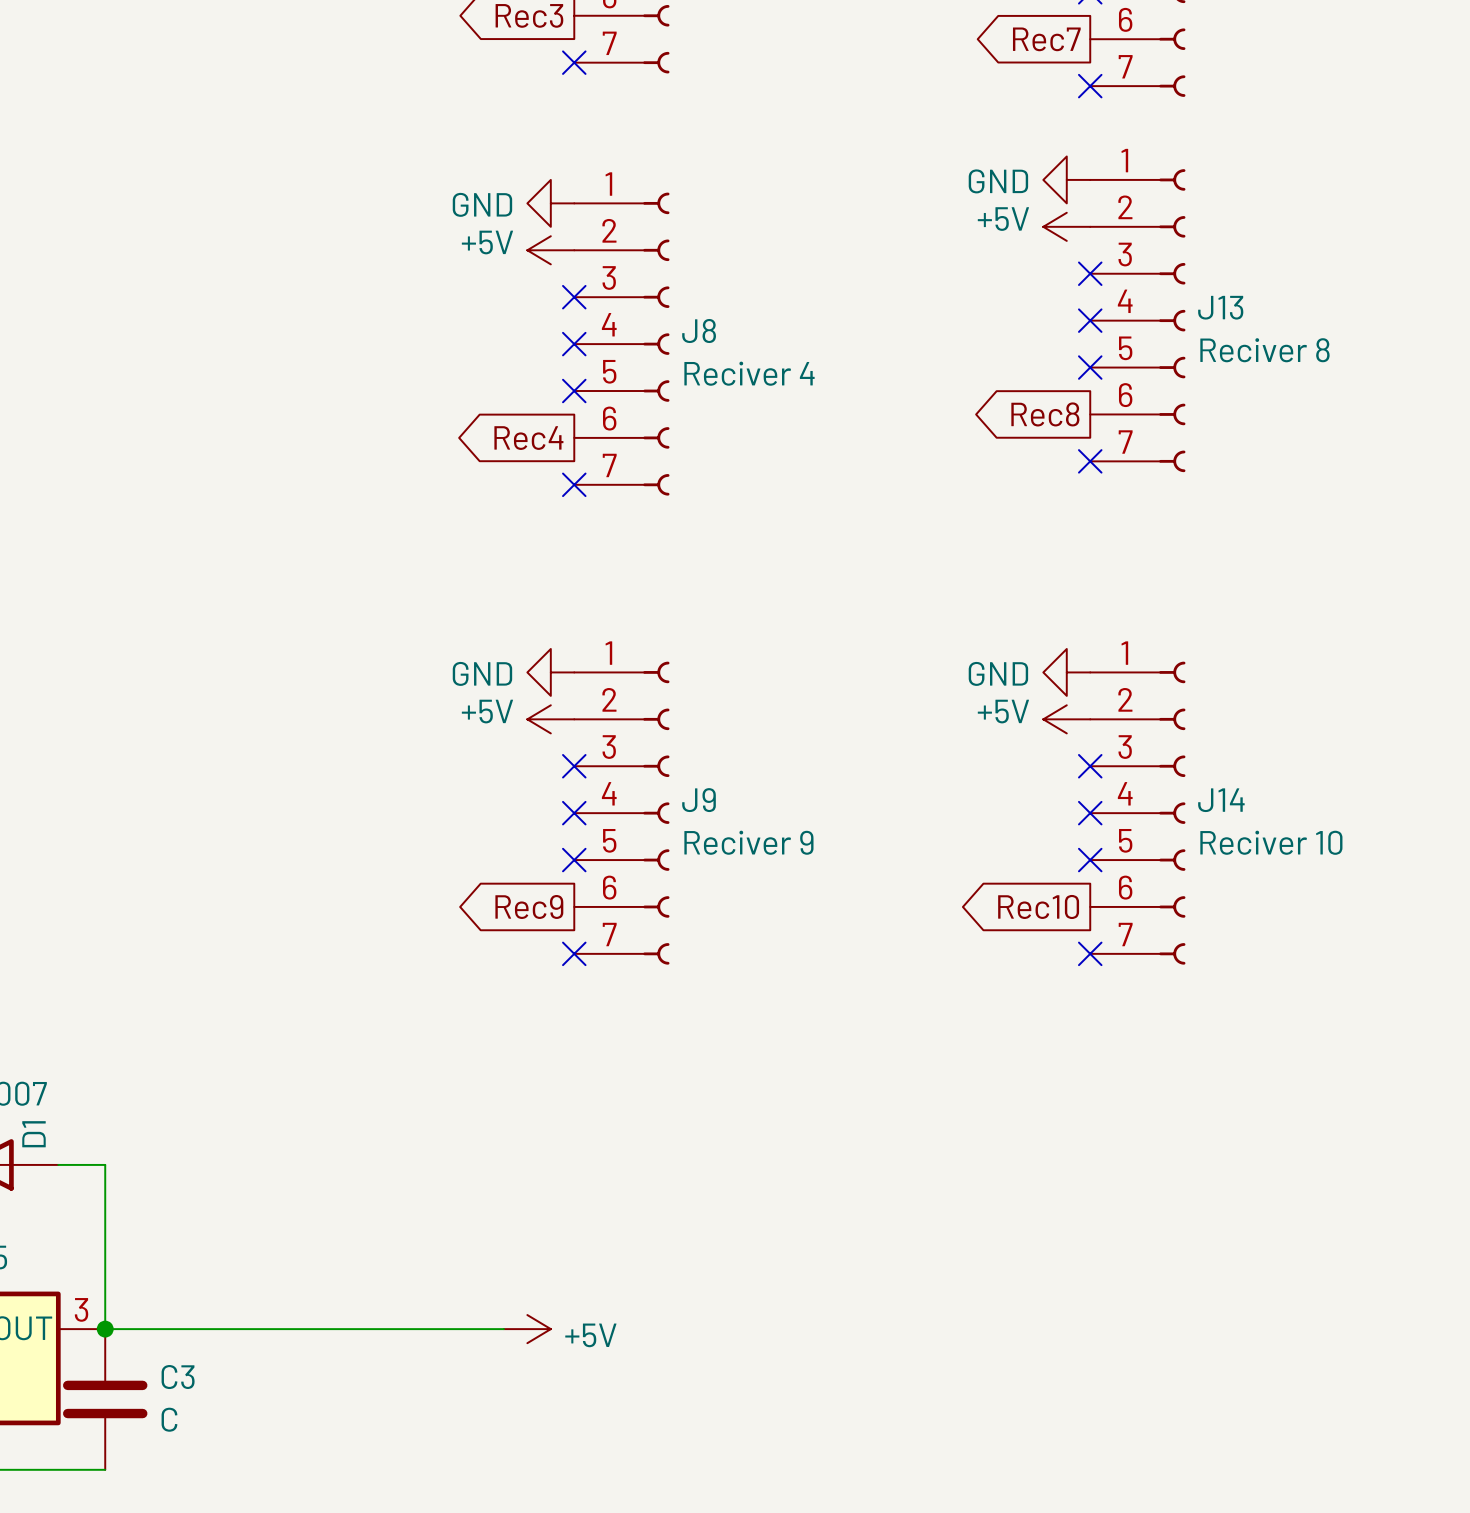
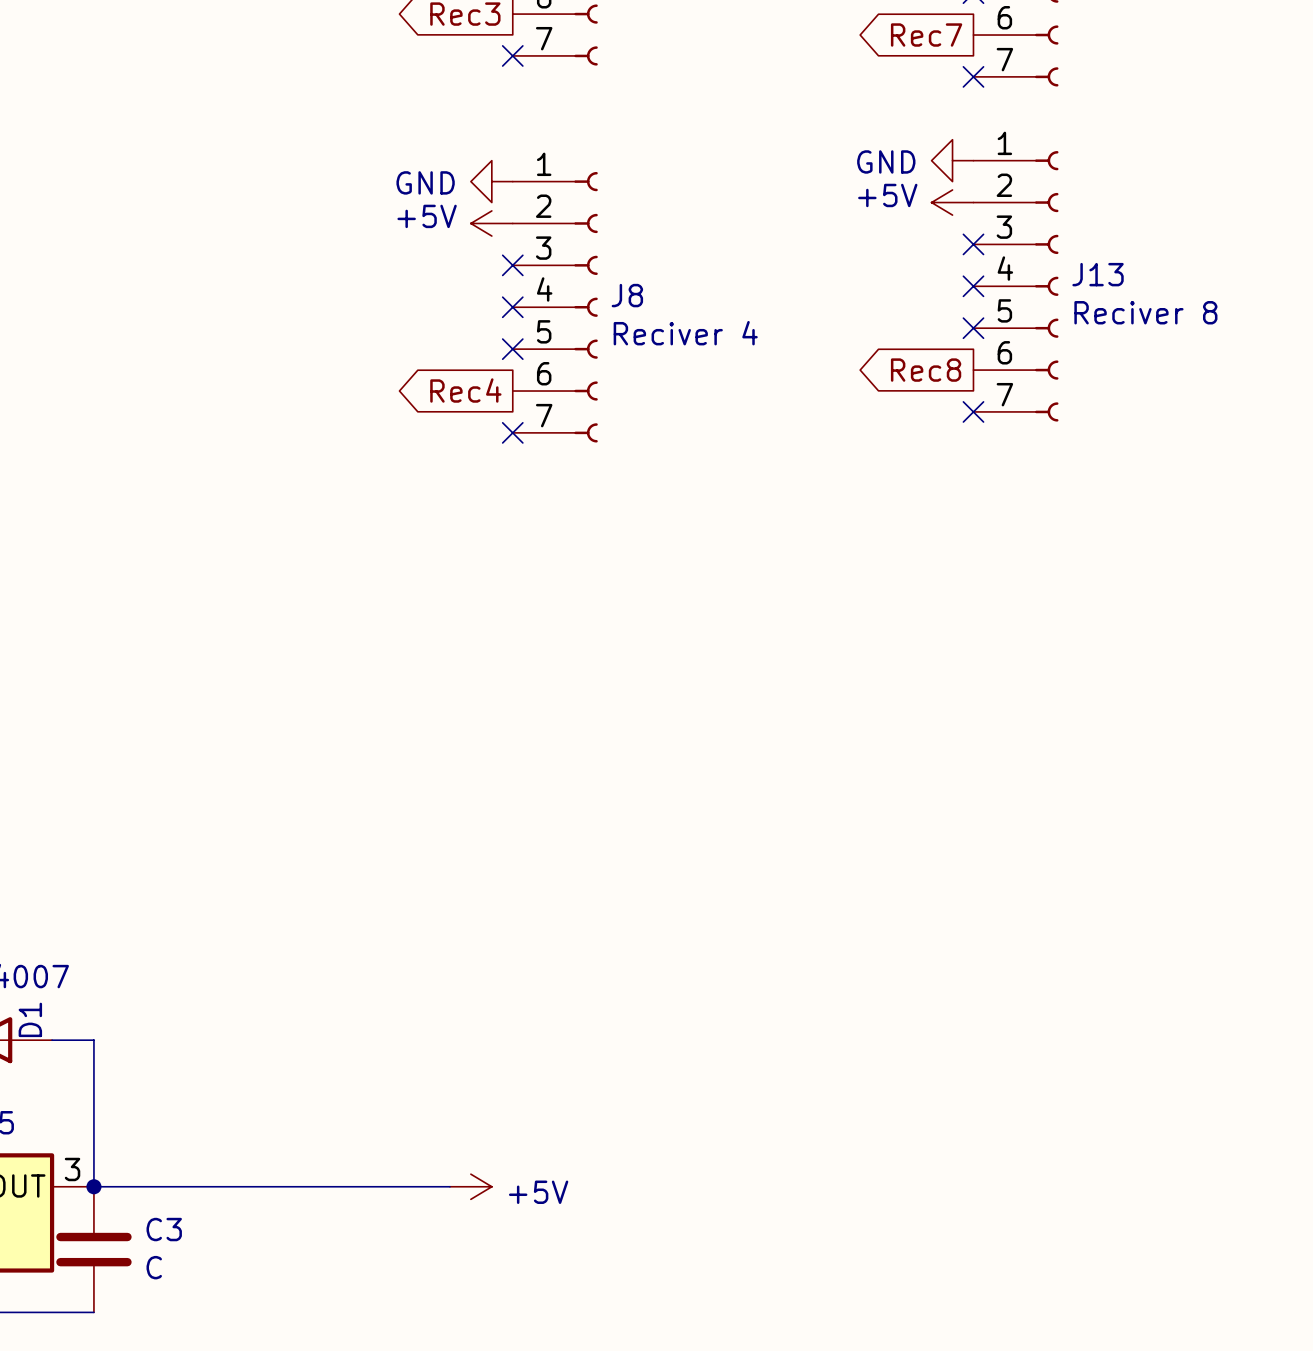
power symbol: GND (550, 672) -> none
power symbol: GND (1066, 672) -> none
power symbol: +5V (550, 719) -> none
power symbol: +5V (1066, 719) -> none
no-connect mark: (574, 766) -> none
no-connect mark: (1090, 766) -> none
no-connect mark: (574, 813) -> none
J9: Reciver 9 (621, 813) -> none
no-connect mark: (1090, 813) -> none
J14: Reciver 10 (1137, 813) -> none
no-connect mark: (574, 860) -> none
no-connect mark: (1090, 860) -> none
global label: Rec9 (529, 906) -> none
global label: Rec10 (1038, 906) -> none
no-connect mark: (574, 953) -> none
no-connect mark: (1090, 953) -> none

